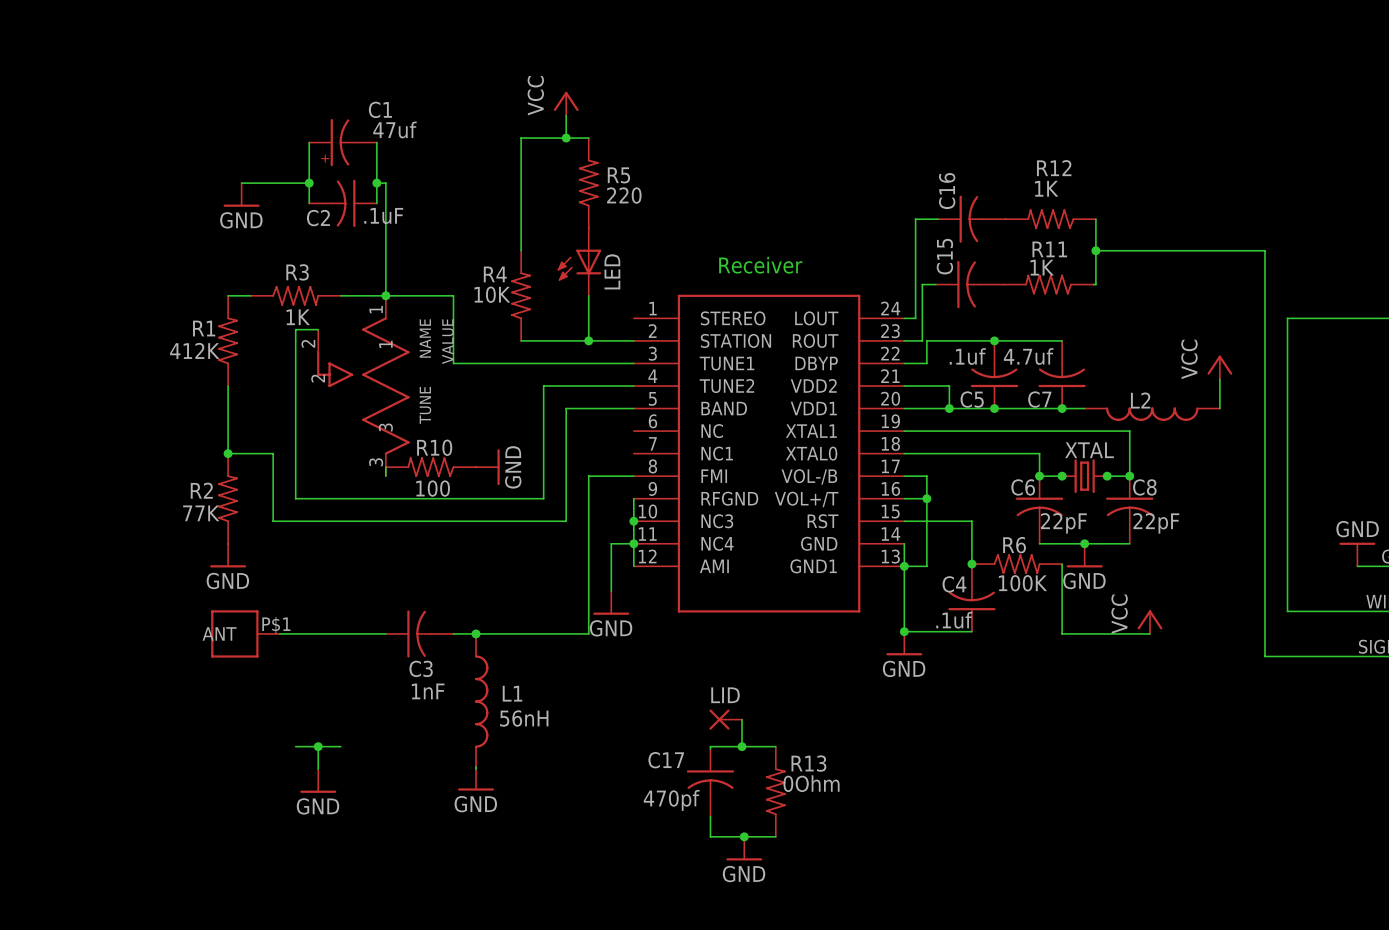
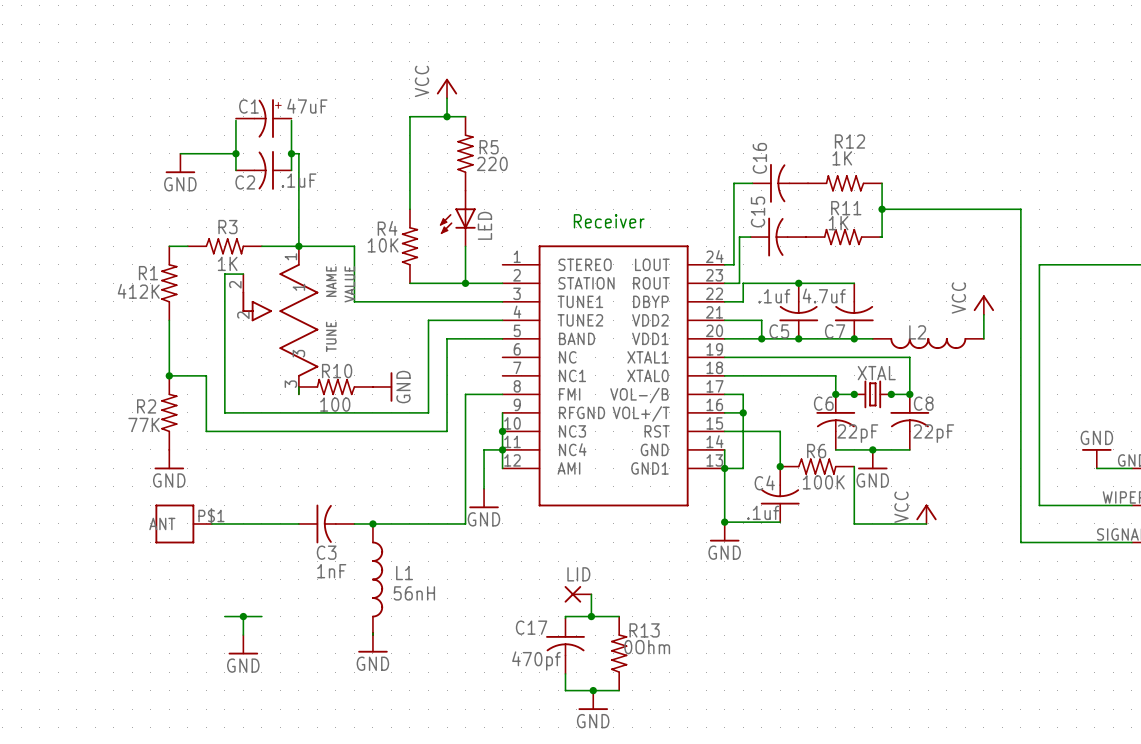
C1 name position: C1 (380, 109) -> C1 (248, 106)
C1 value: 47uf (394, 129) -> 47uF (307, 106)
C1 rotation: 0° (338, 142) -> 180° (267, 118)

